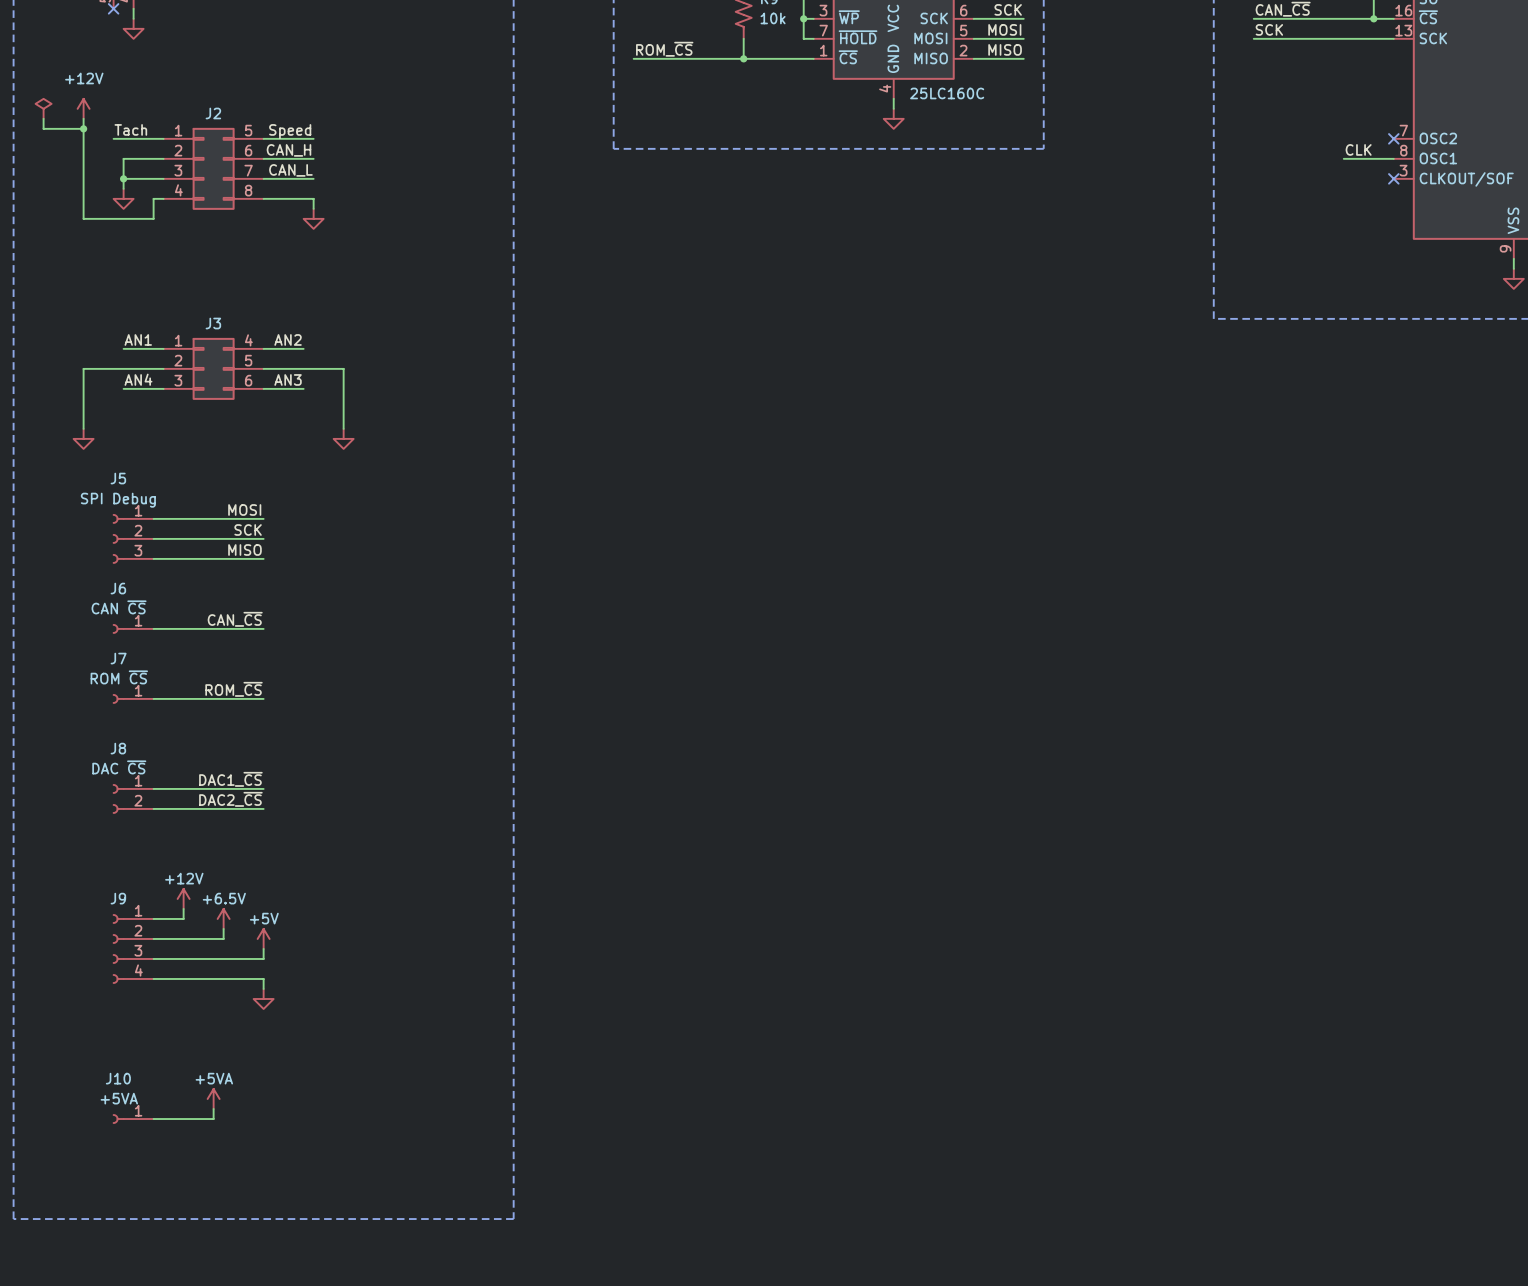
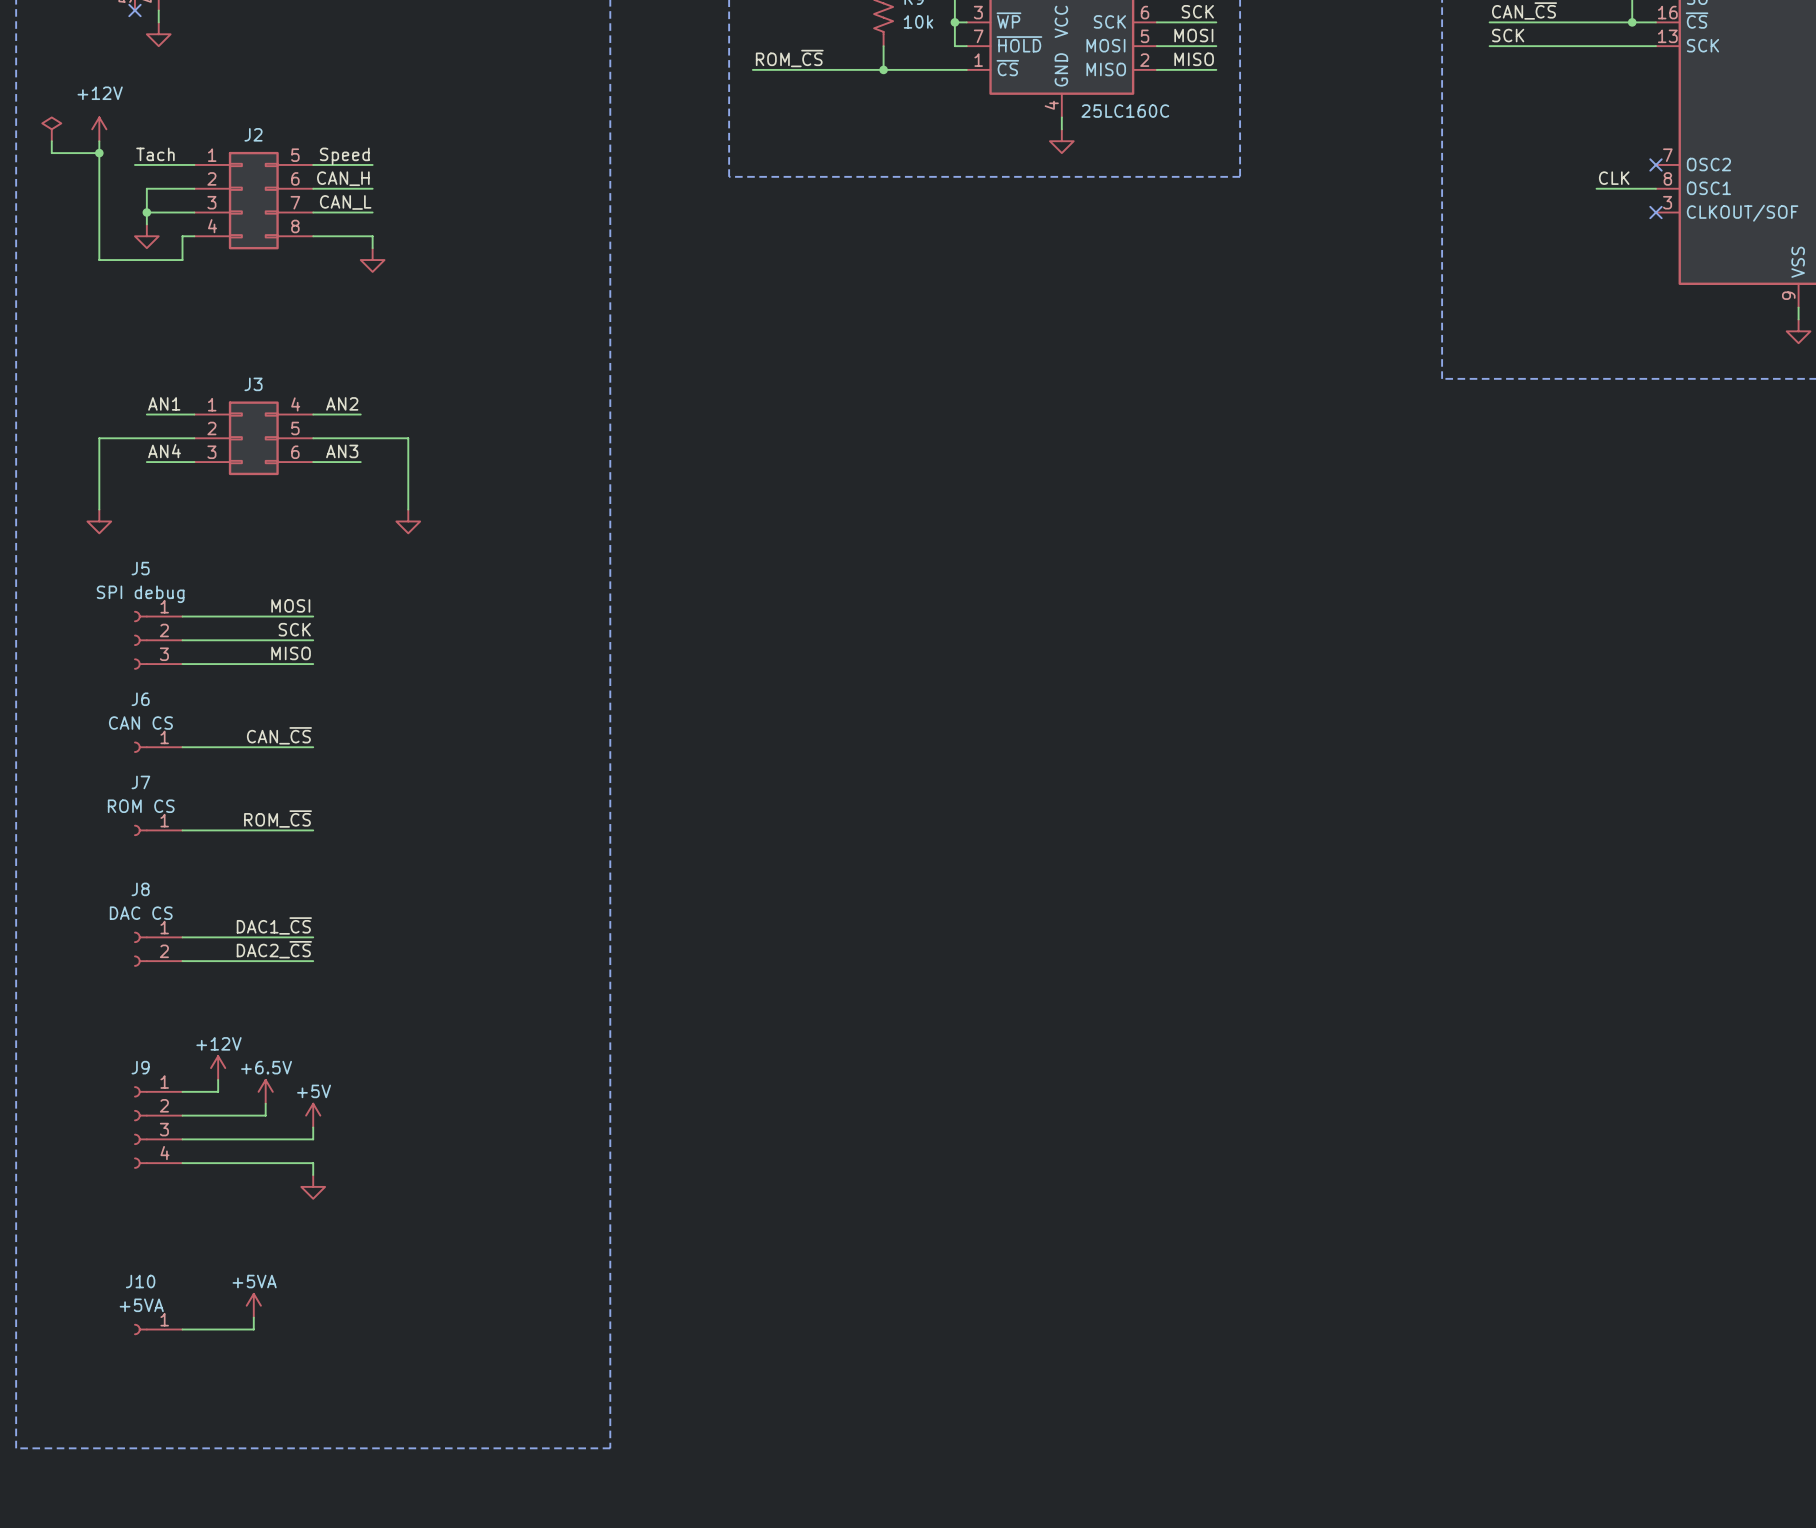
J5 value: SPI Debug (118, 500) -> SPI debug (140, 594)
J6 value: CAN ~{CS} (119, 607) -> CAN CS (140, 723)
J7 value: ROM ~{CS} (119, 677) -> ROM CS (141, 806)
J8 value: DAC ~{CS} (119, 767) -> DAC CS (141, 913)

